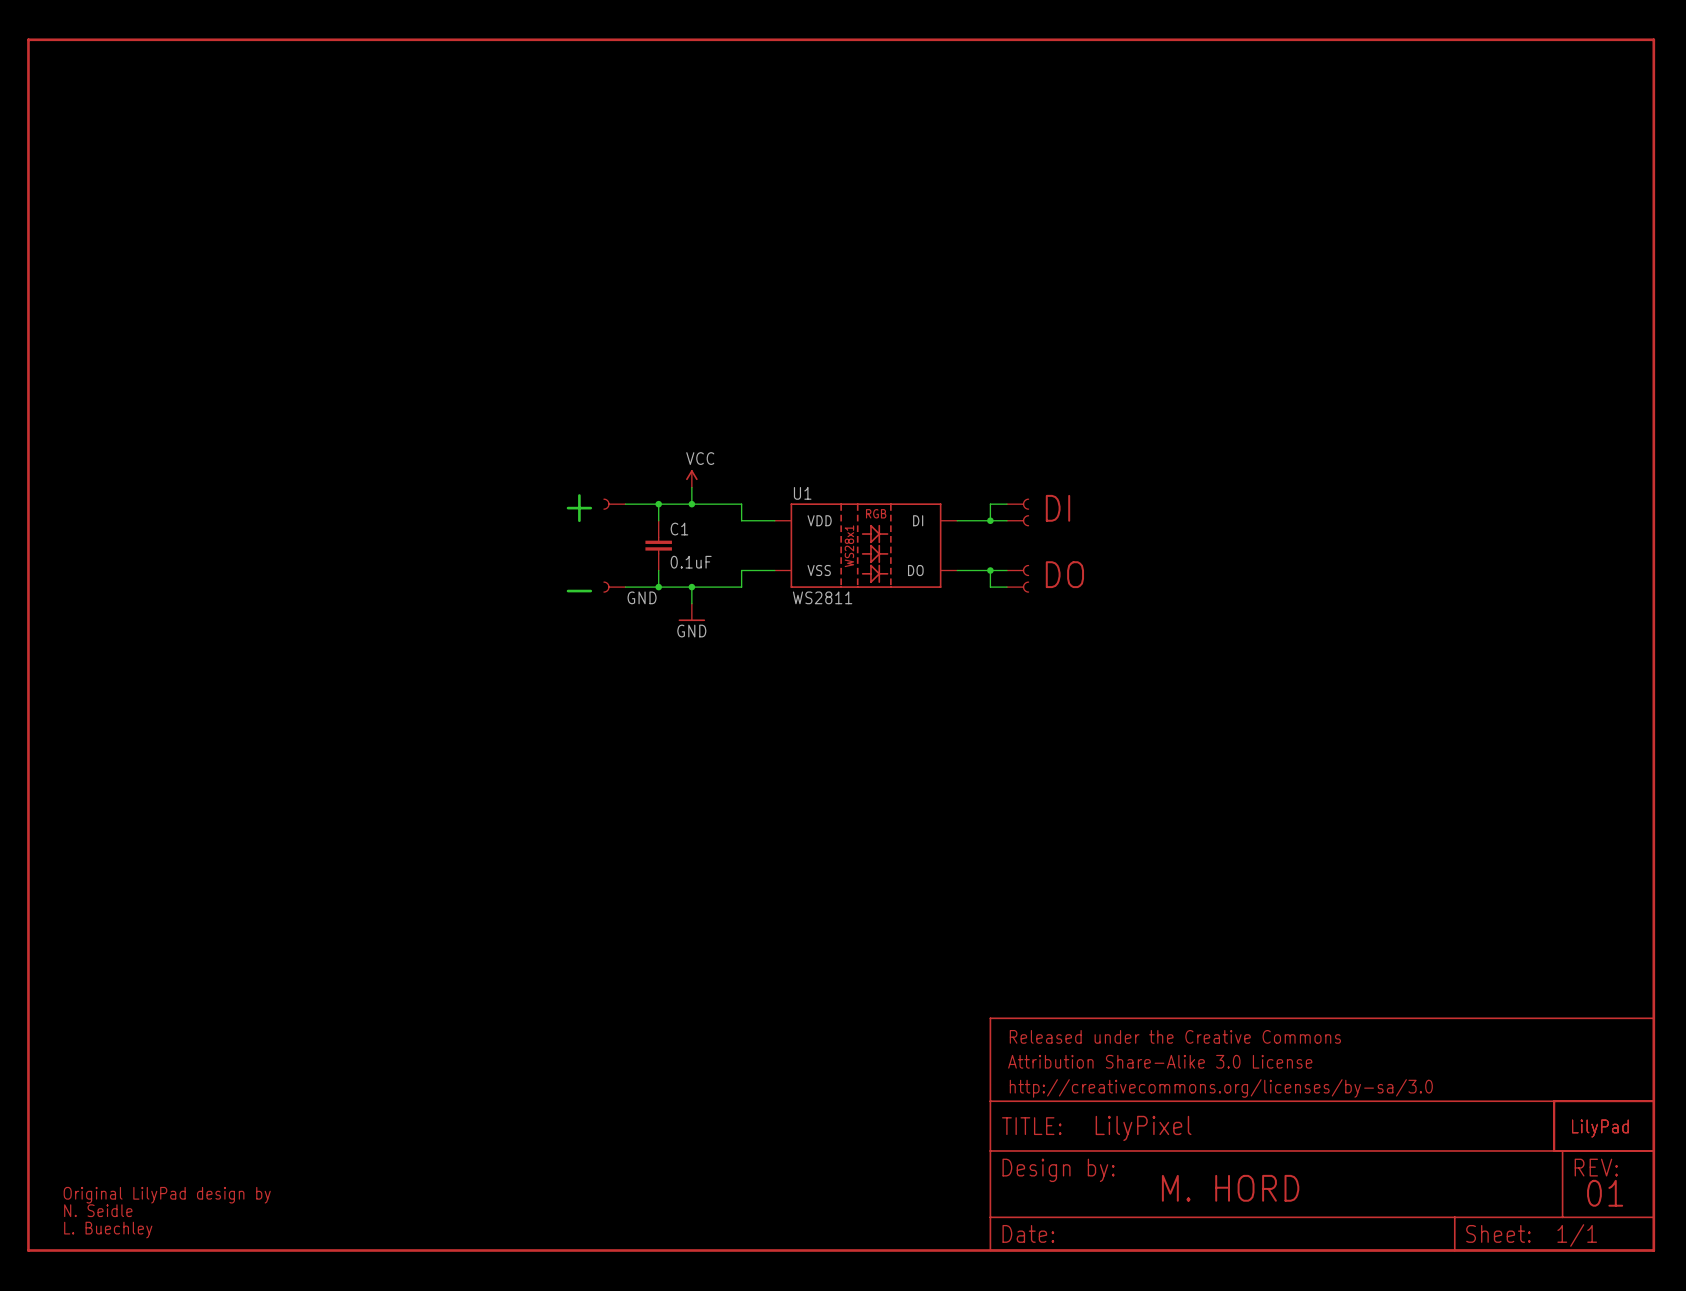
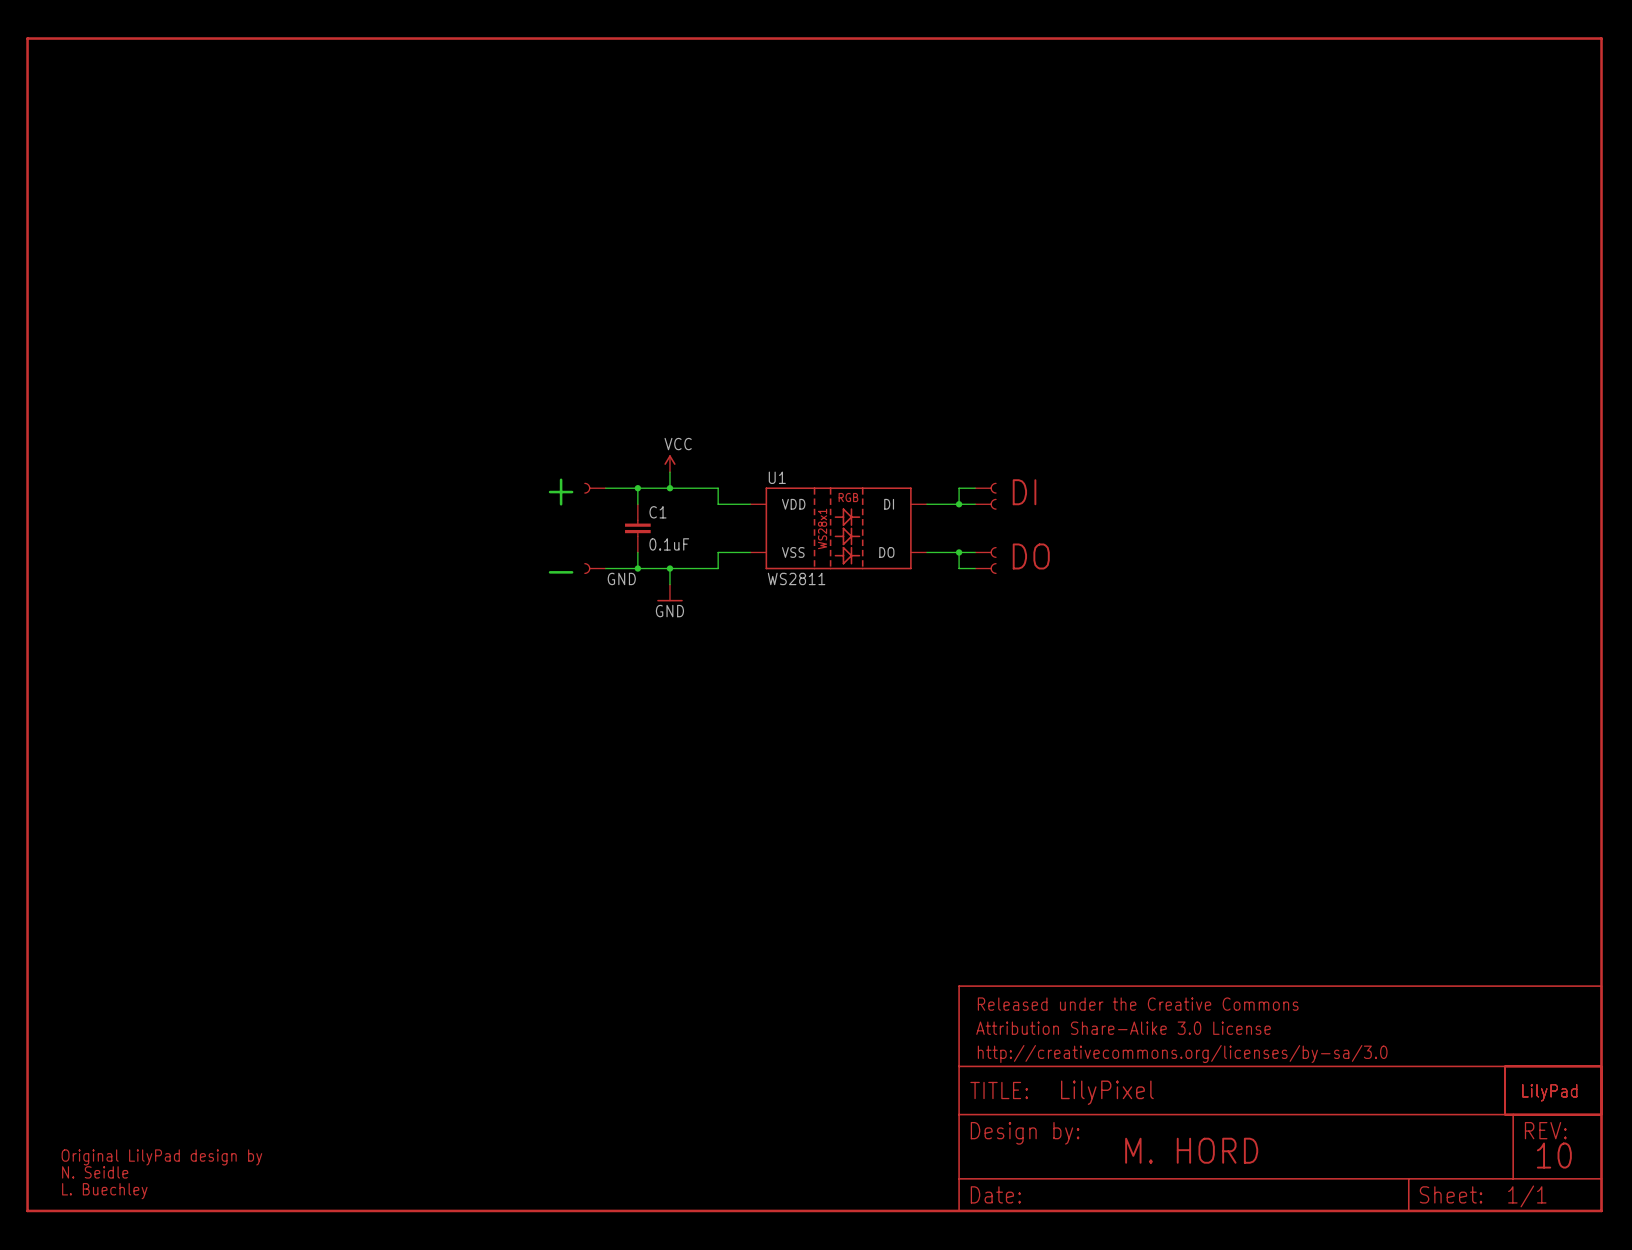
text: 01 (1605, 1193) -> 10 (1554, 1155)

